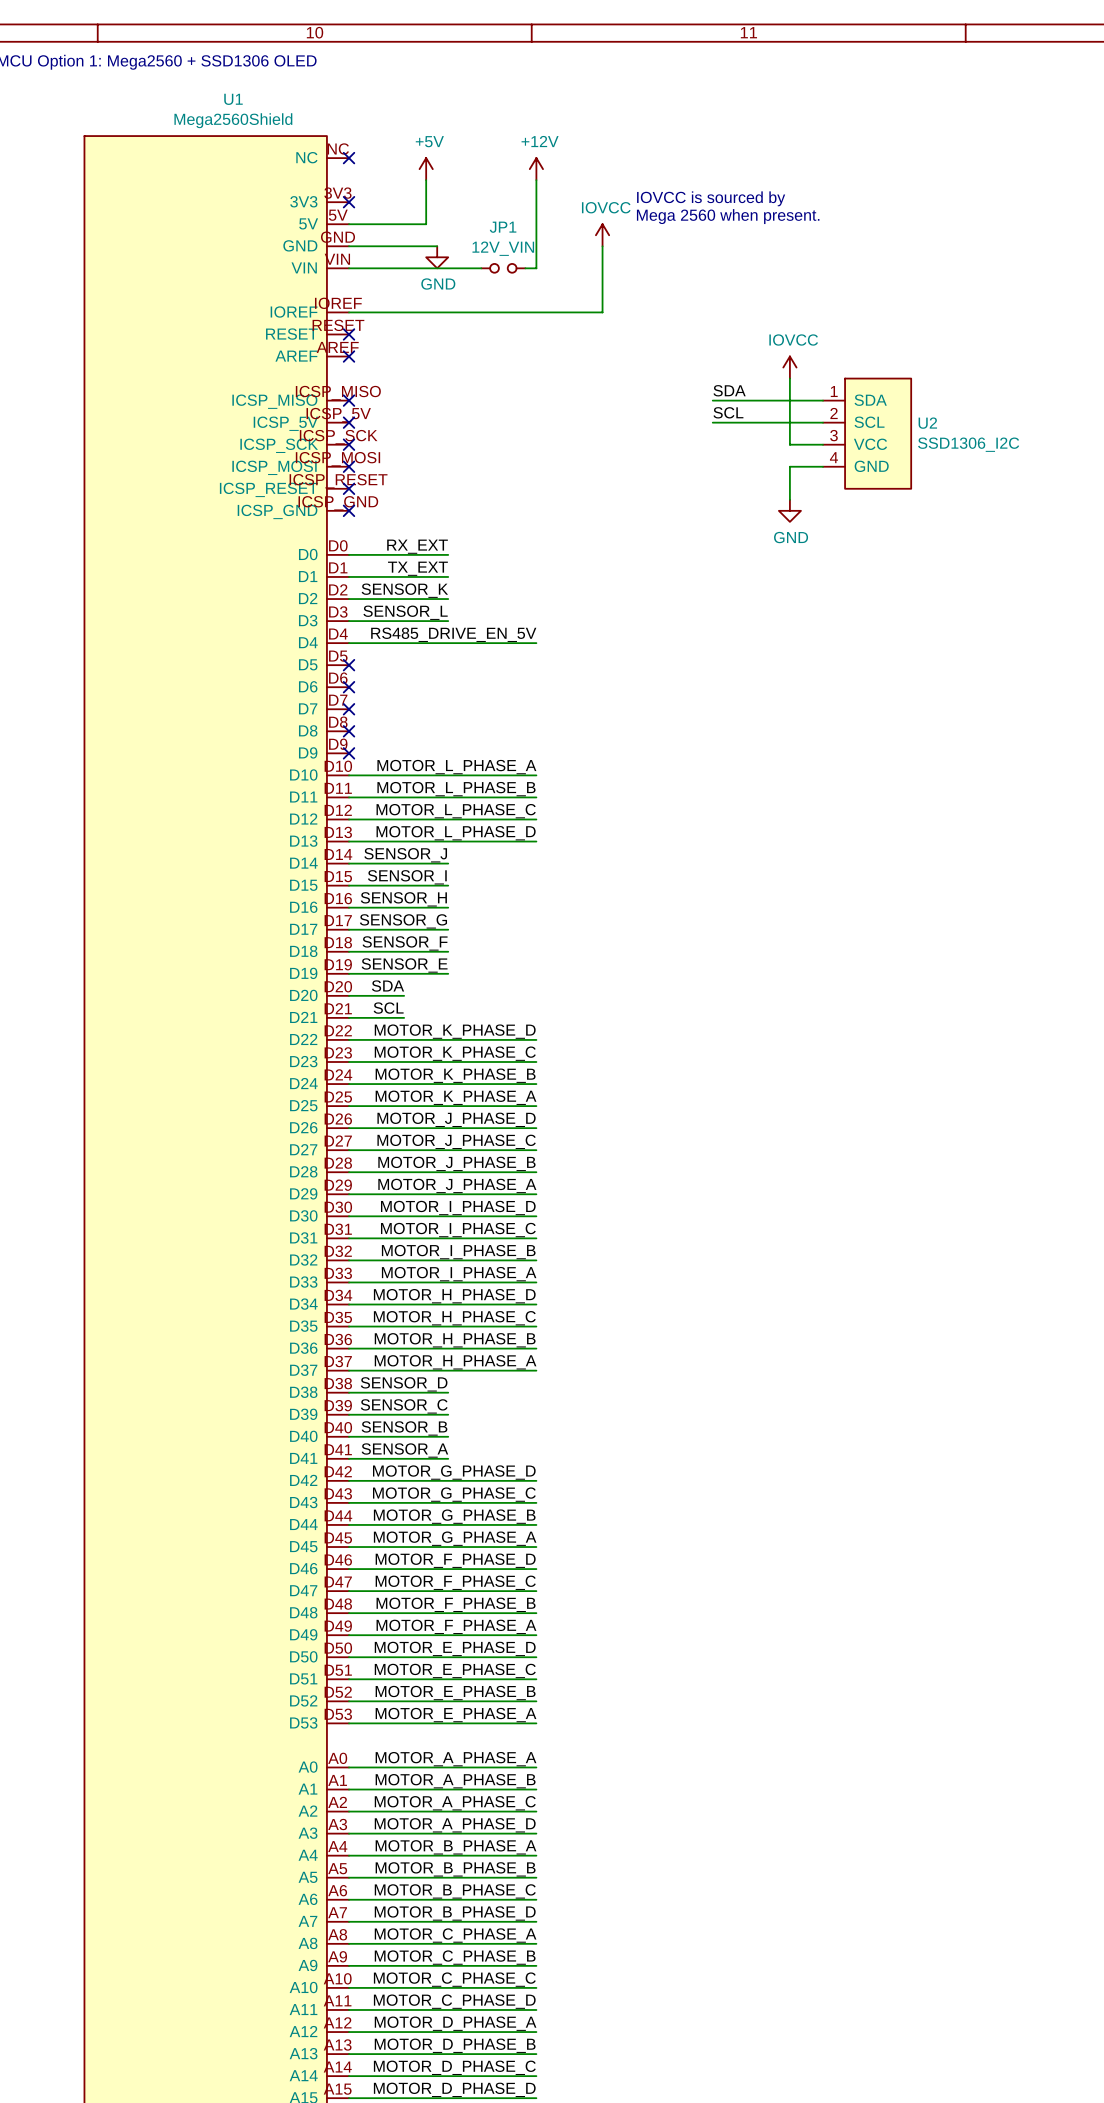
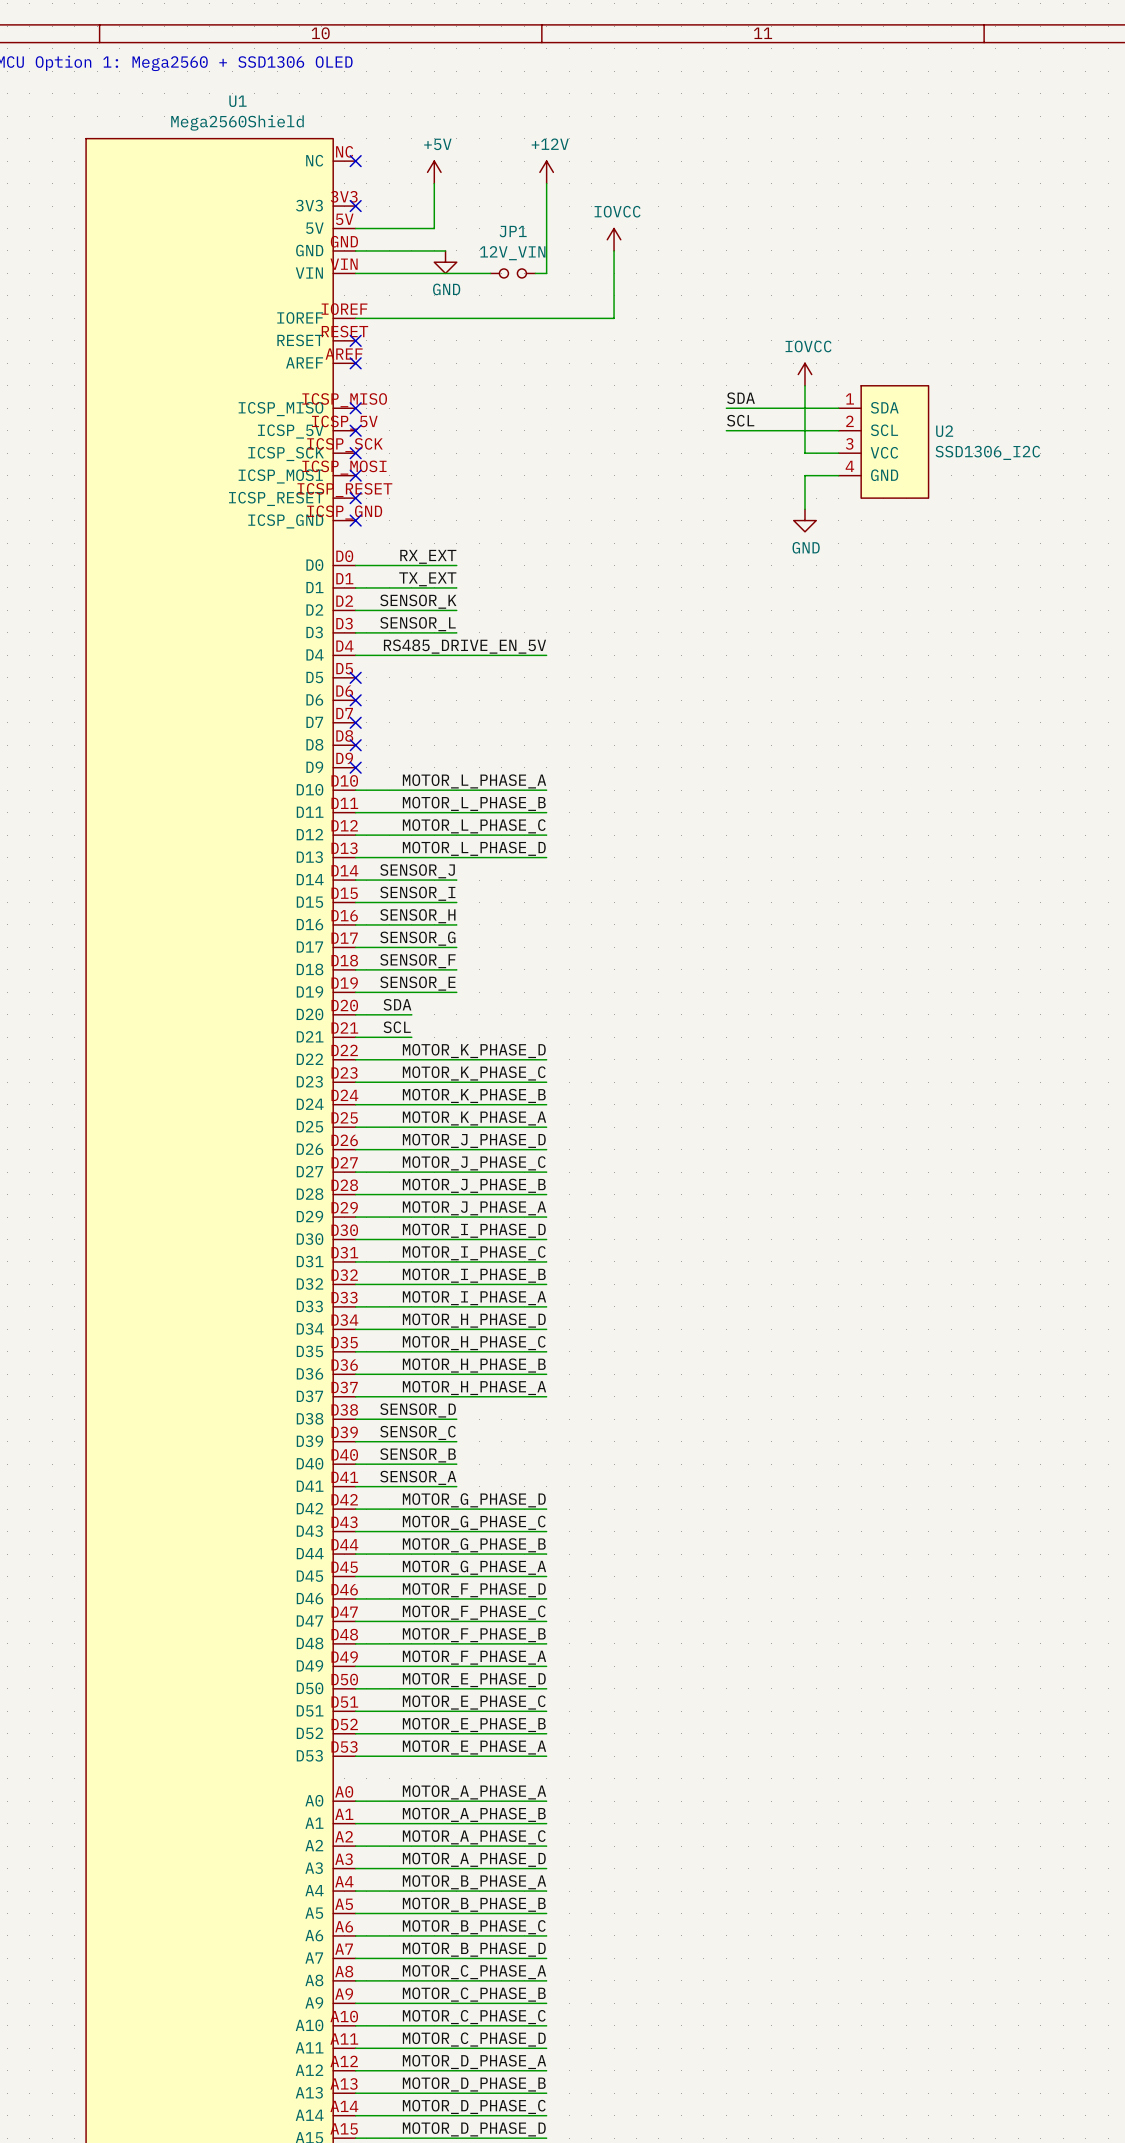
text: IOVCC is sourced by (711, 198) -> none
text: Mega 2560 when present. (728, 216) -> none

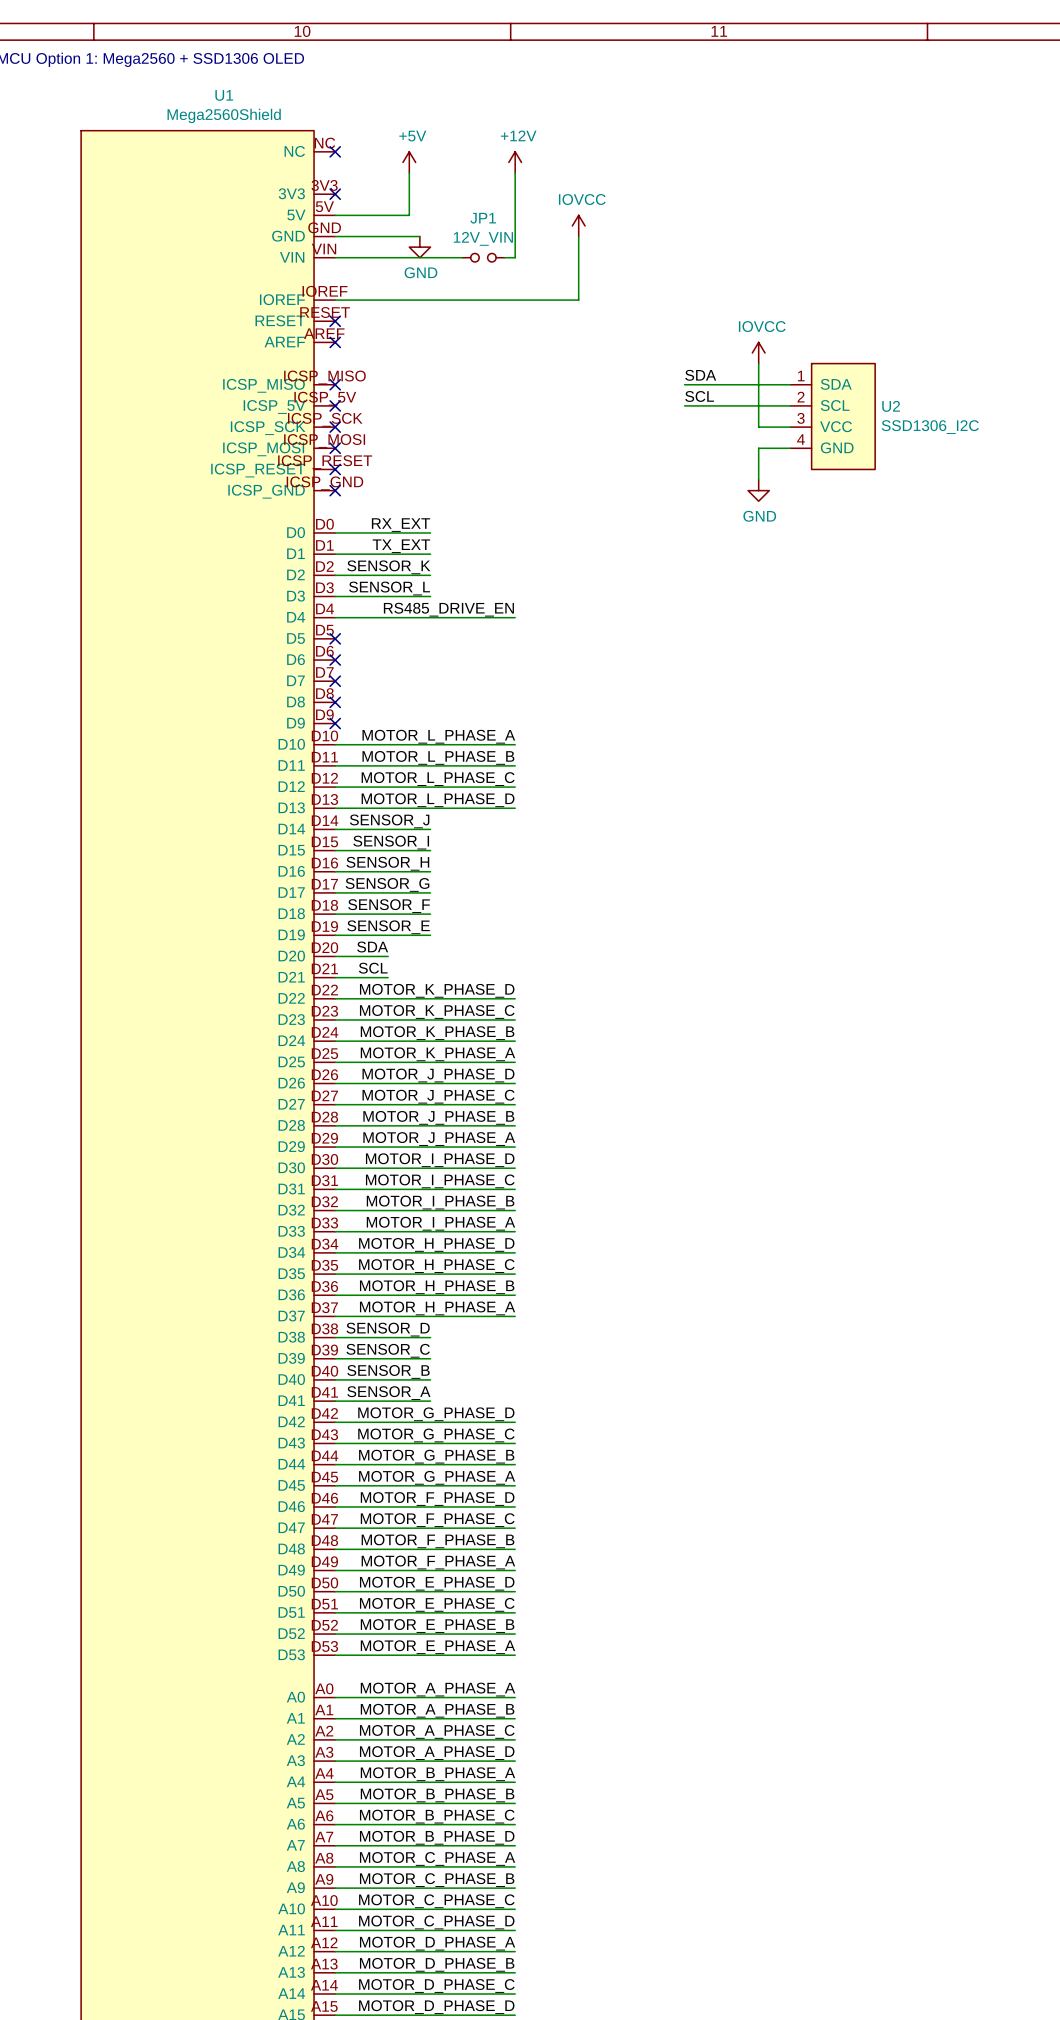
label: RS485_DRIVE_EN_5V (464, 646) -> RS485_DRIVE_EN (448, 609)

